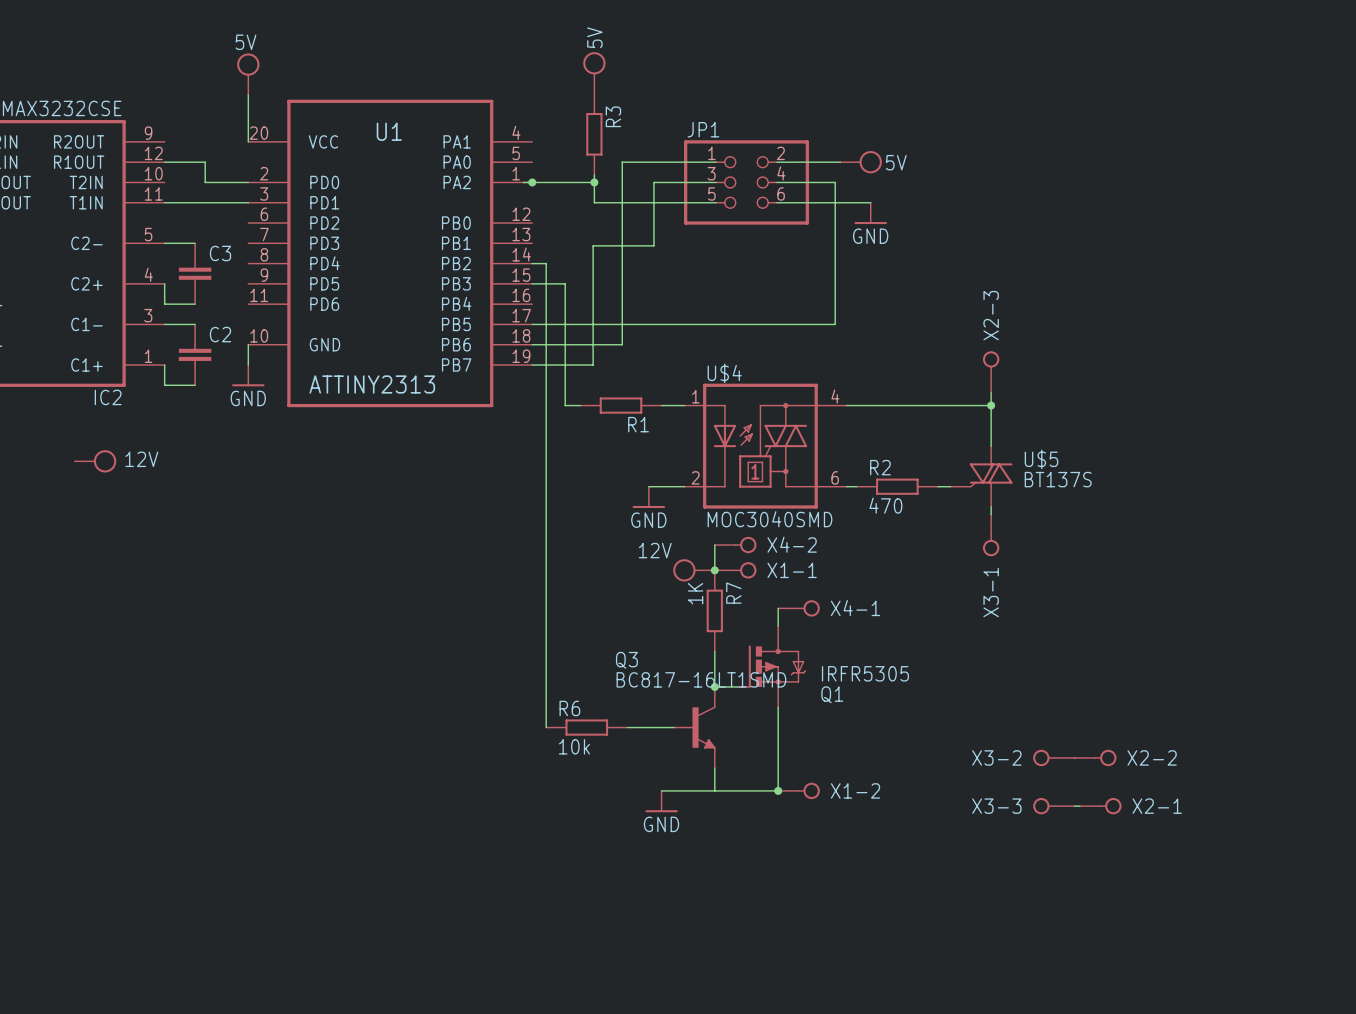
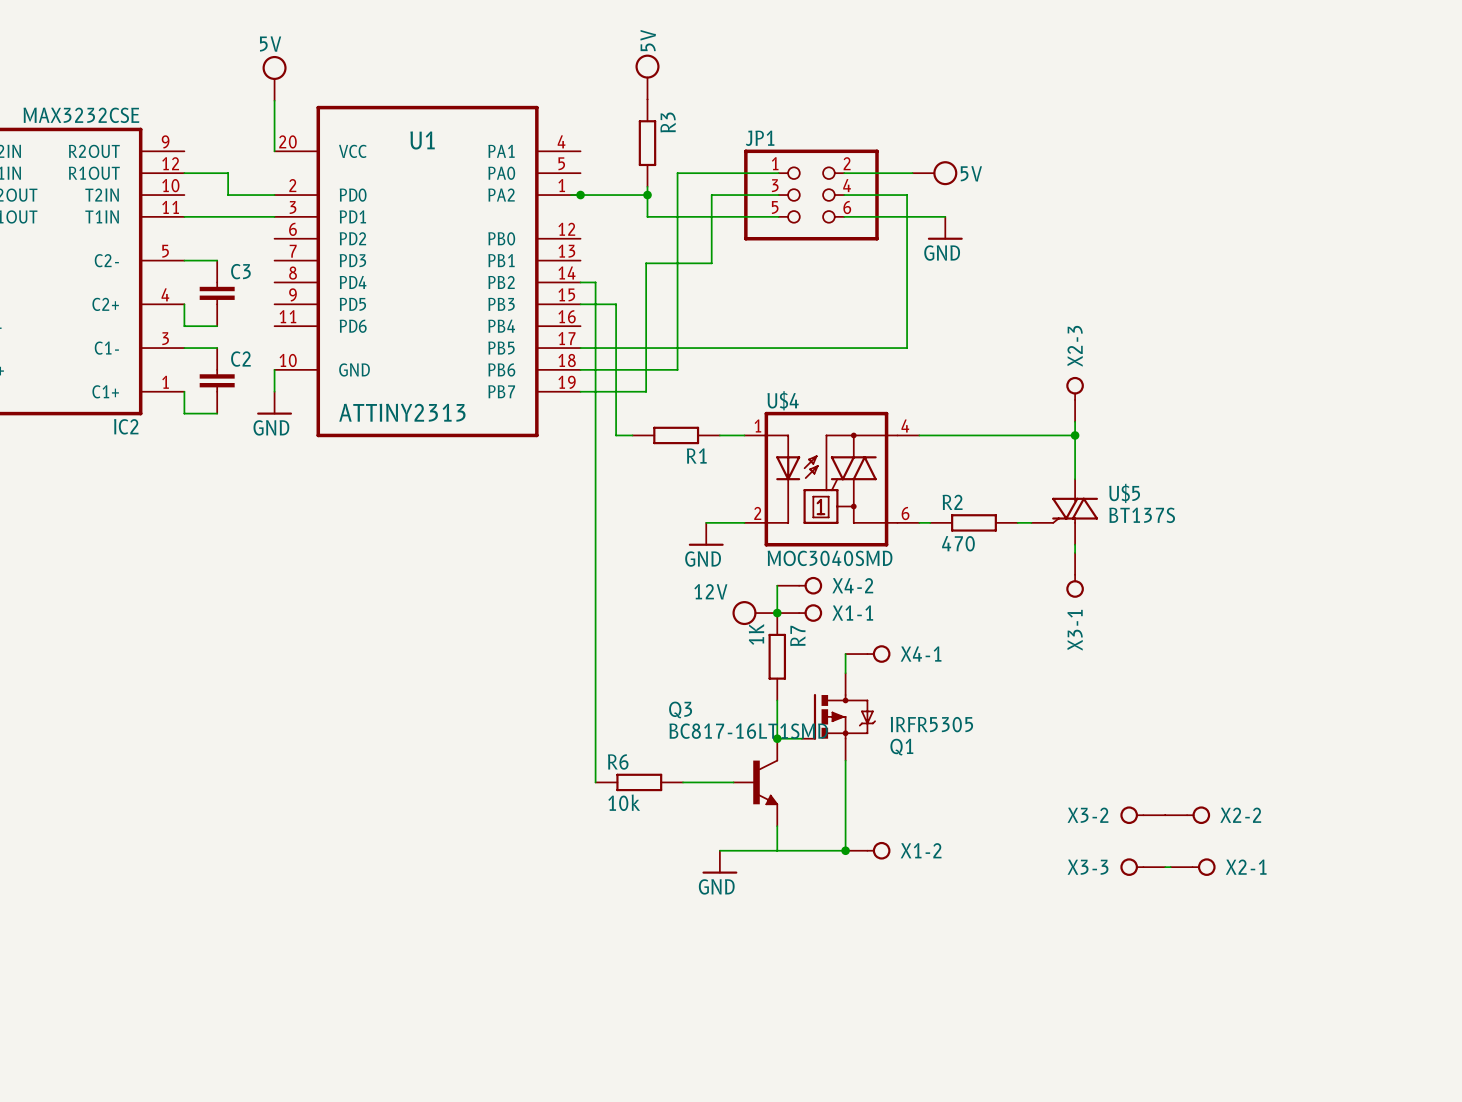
power symbol: 12V (95, 461) -> none

